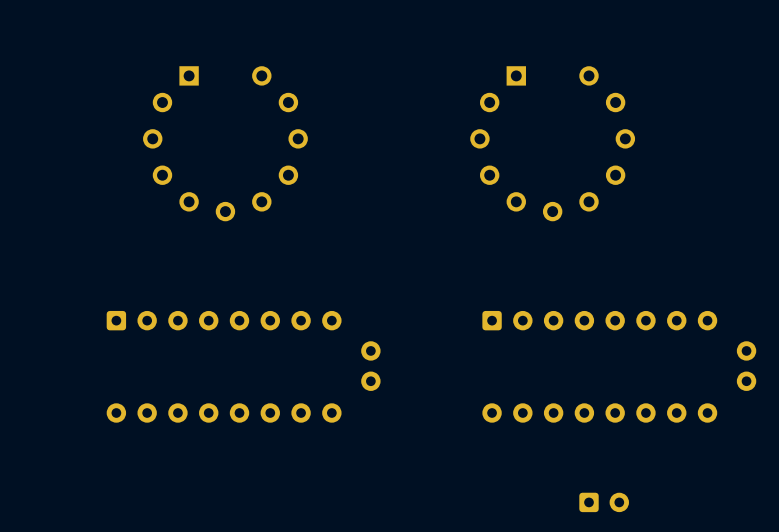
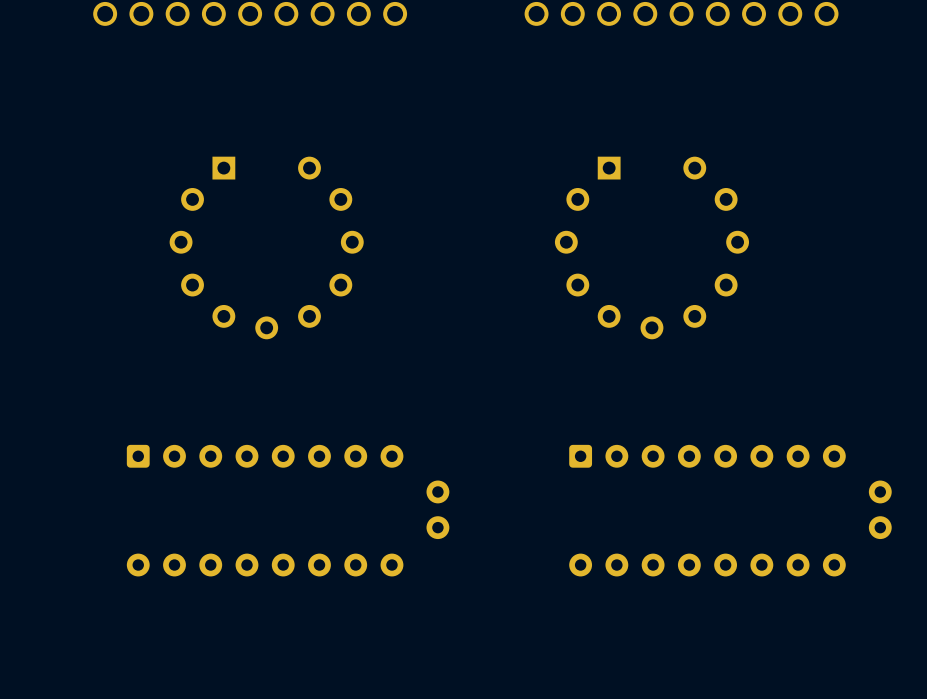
part: (604, 502) -> none

